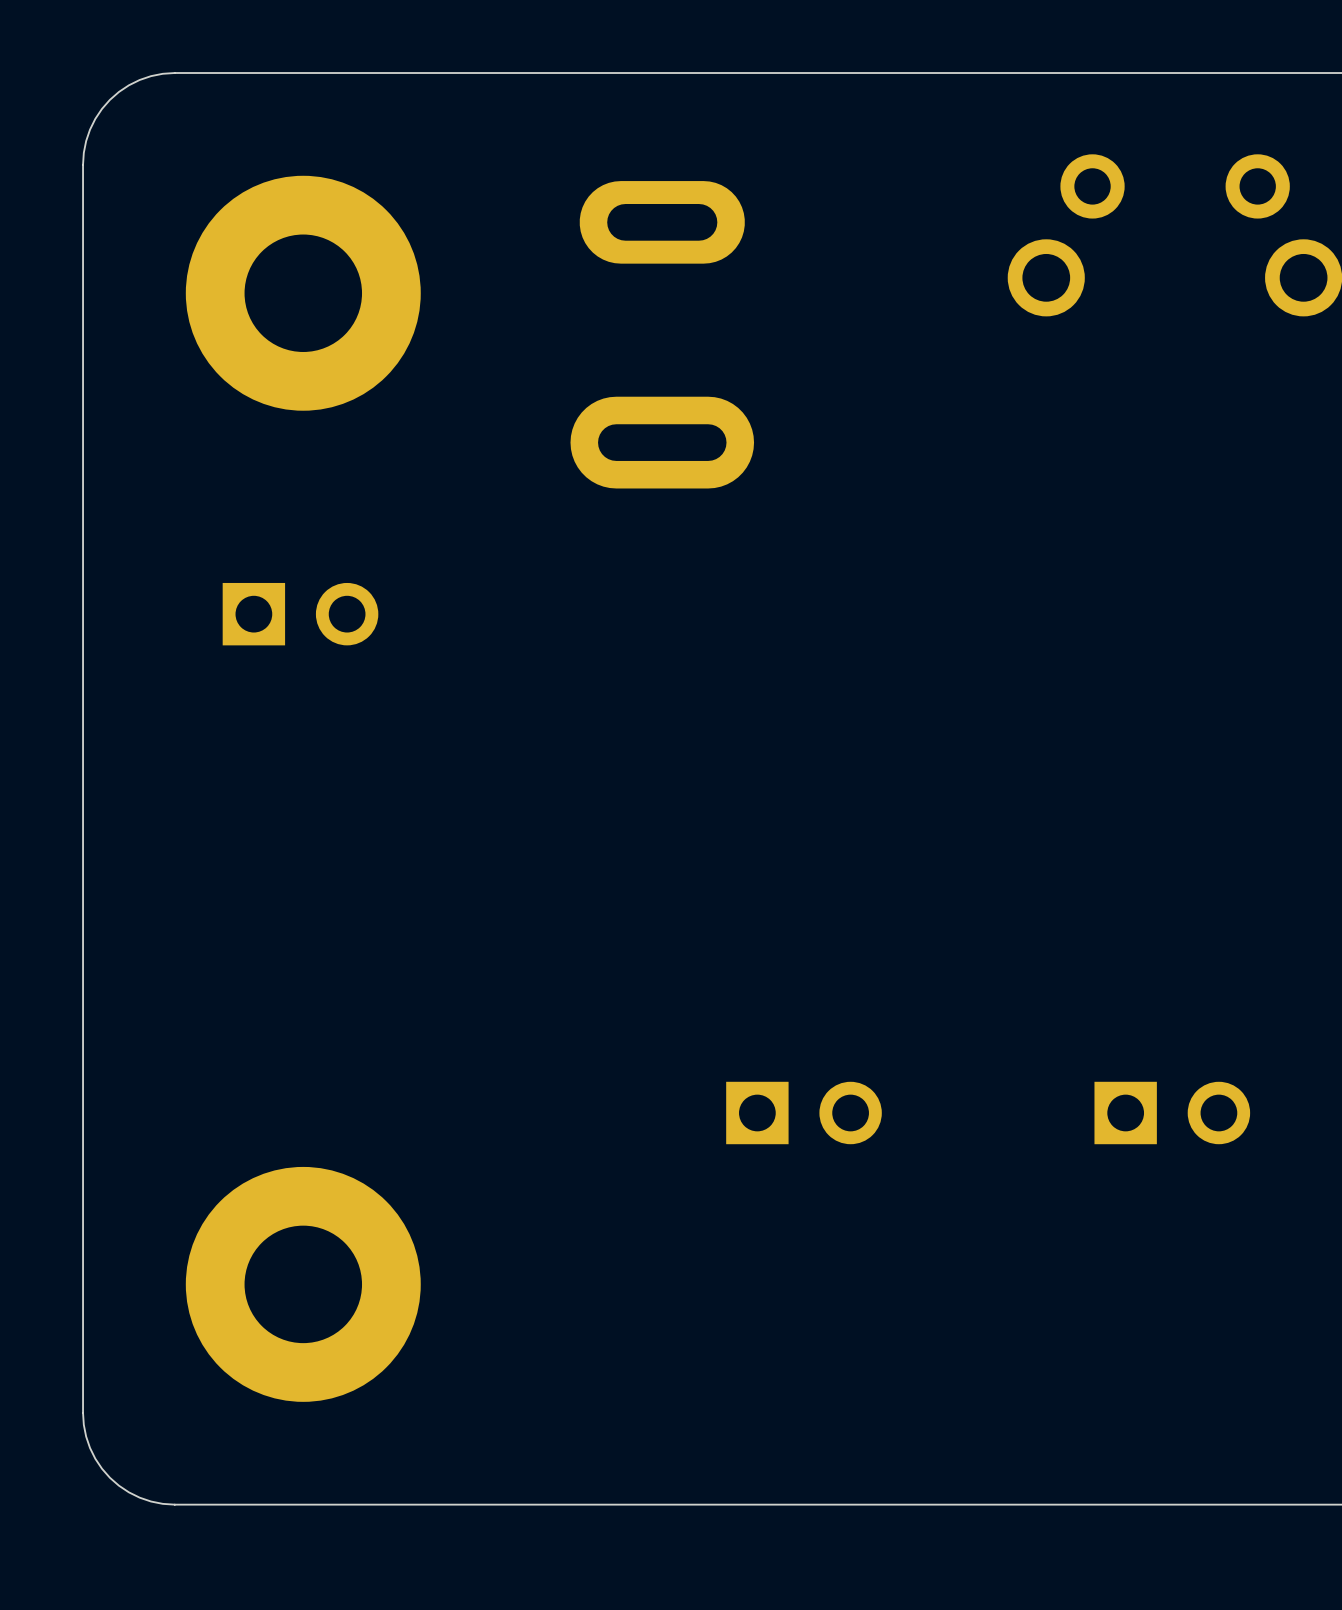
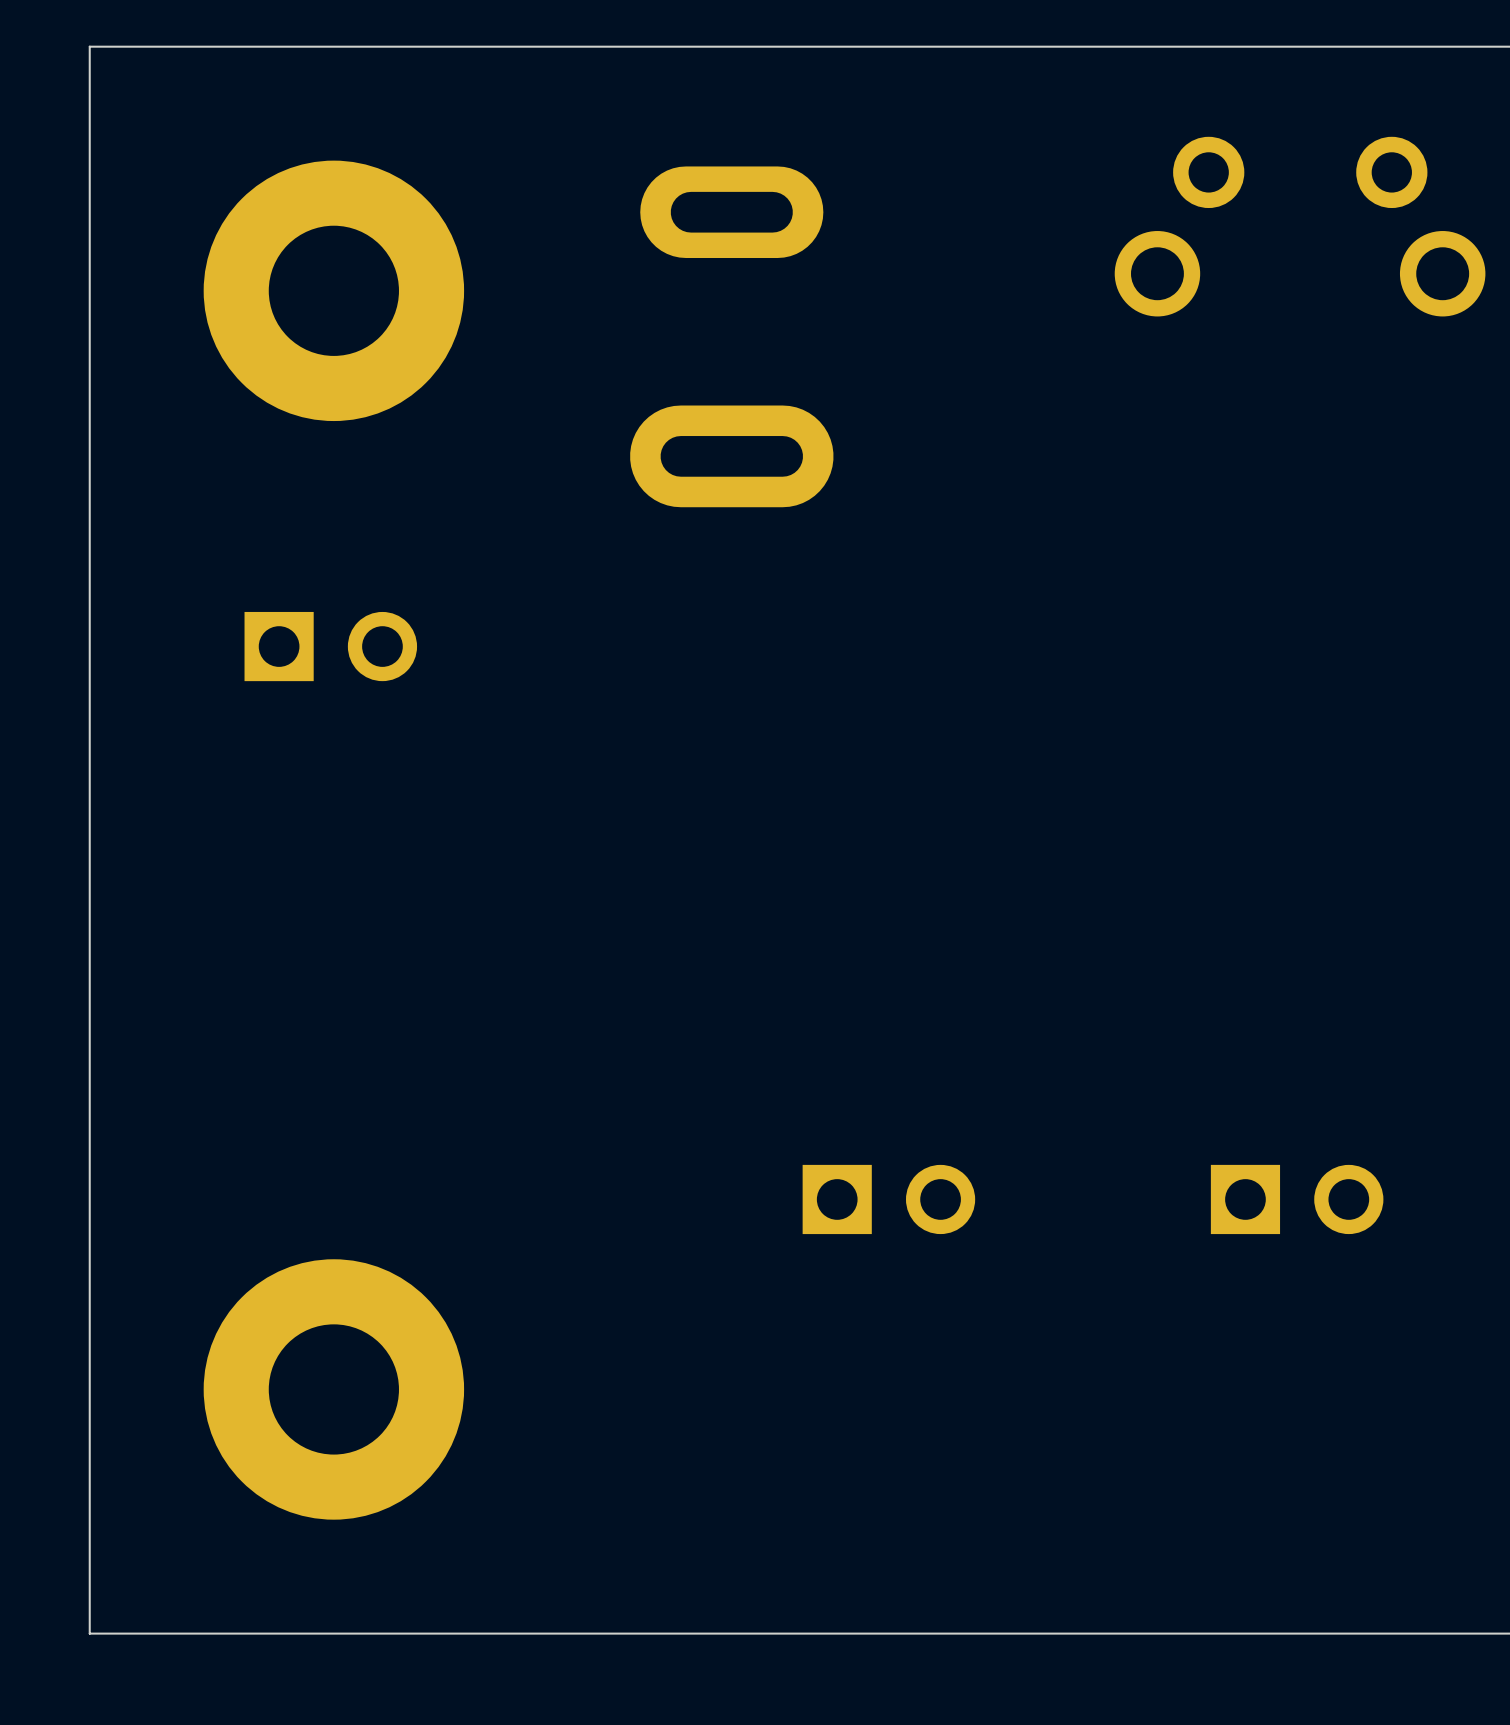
board edge: (174, 73) (162, 73) (139, 79) (118, 91) (109, 99) (95, 118) (90, 129) (83, 152) (83, 164) -> (191, 46) (89, 46) (89, 148)
board edge: (83, 1412) (83, 1424) (90, 1447) (95, 1458) (109, 1477) (118, 1485) (139, 1497) (162, 1503) (174, 1504) -> (89, 1531) (89, 1633) (191, 1633)

